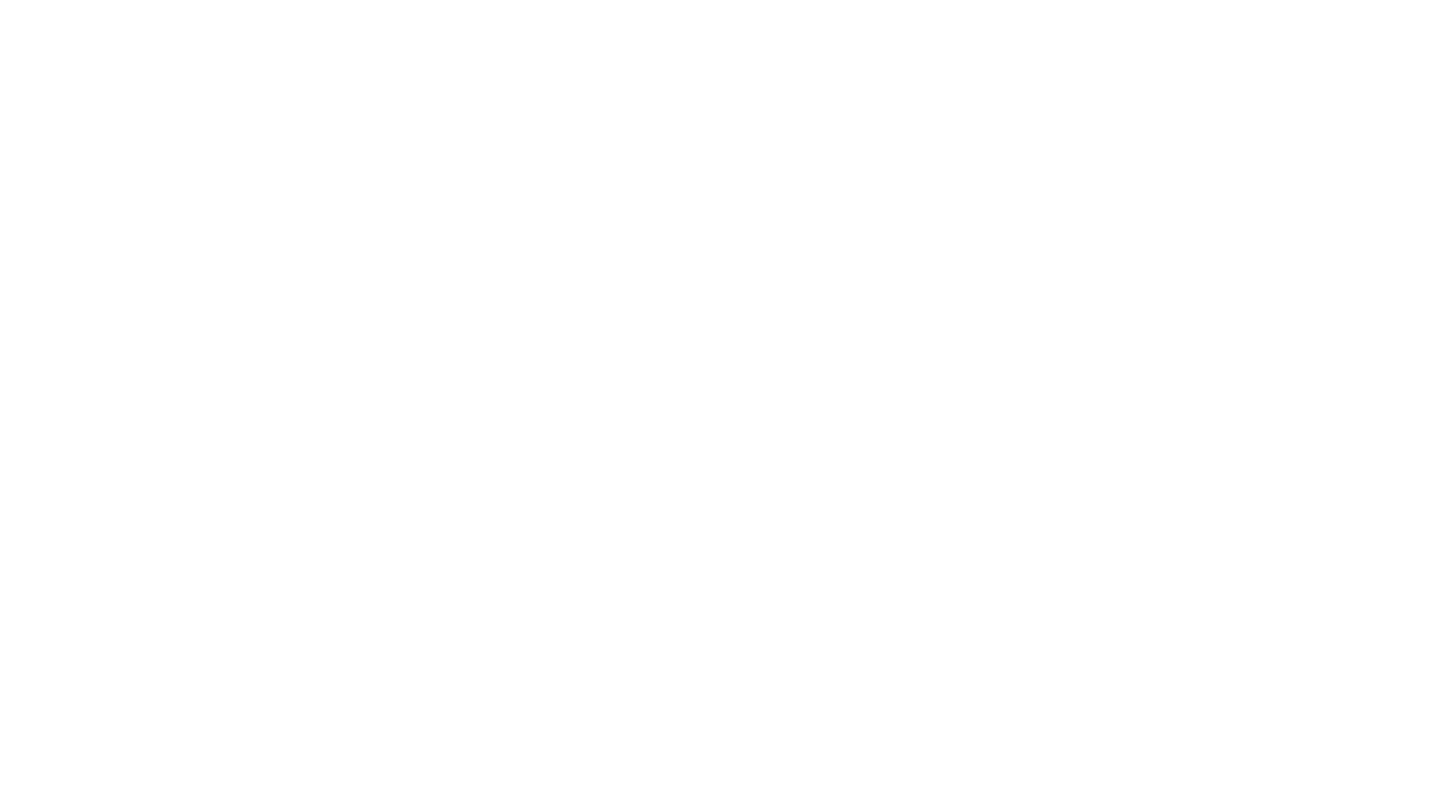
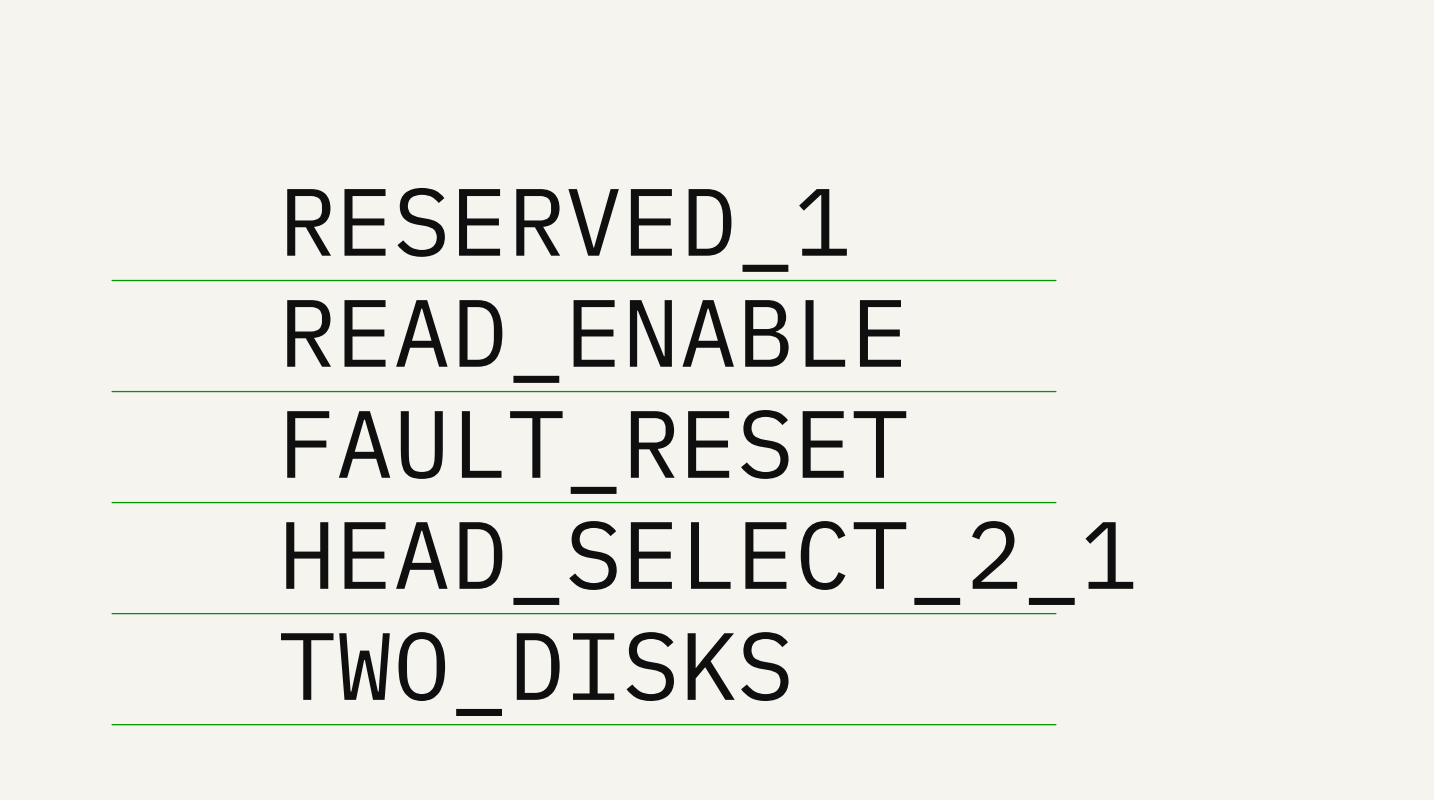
label: none -> RESERVED_1 (567, 229)
wire: none -> (112, 280) (1055, 280)
label: none -> READ_ENABLE (594, 341)
wire: none -> (112, 391) (1055, 391)
label: none -> FAULT_RESET (596, 451)
wire: none -> (112, 502) (1055, 502)
label: none -> HEAD_SELECT_2_1 (709, 563)
wire: none -> (112, 613) (1055, 613)
label: none -> TWO_DISKS (534, 674)
wire: none -> (112, 724) (1055, 724)

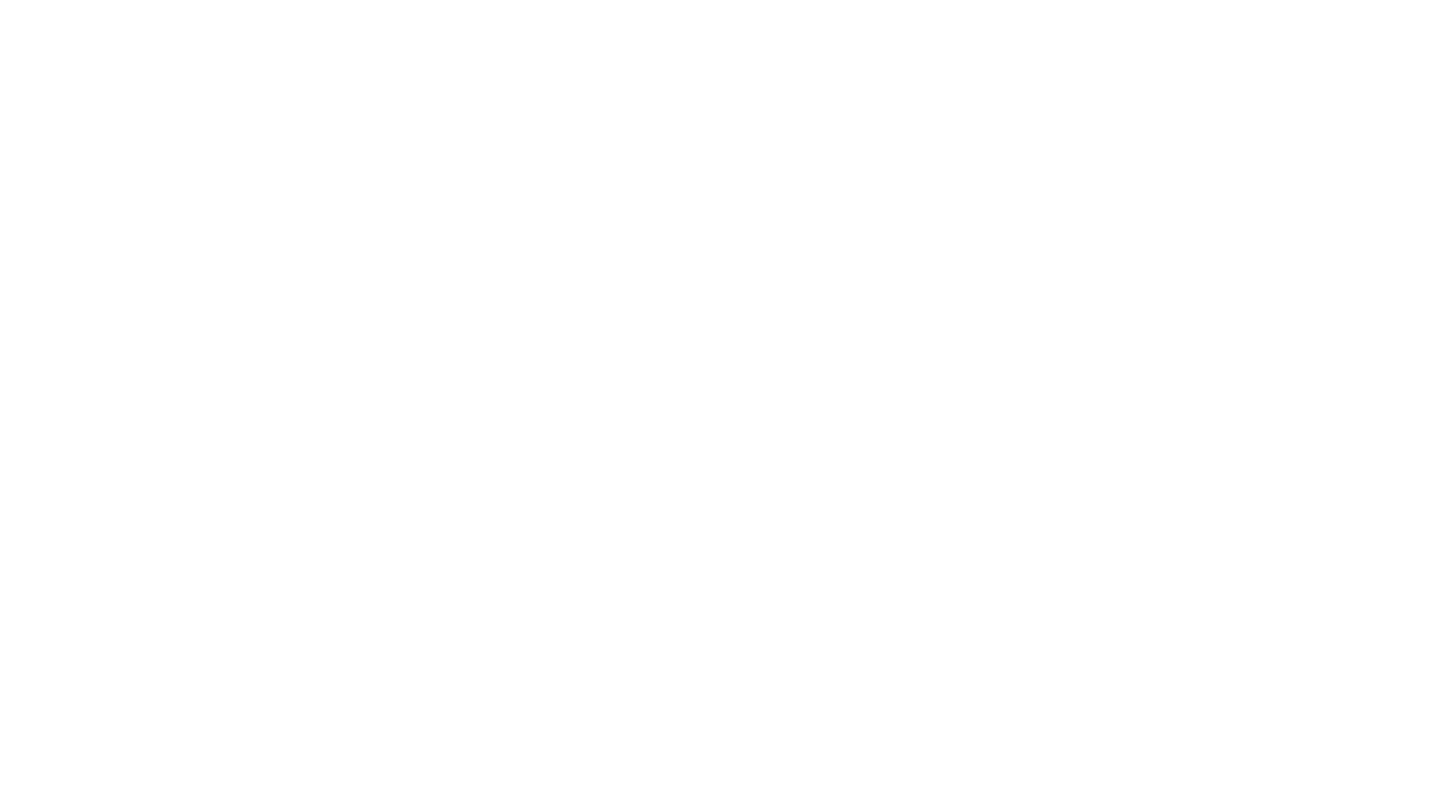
label: RESERVED_1 (567, 229) -> none
wire: (112, 280) (1055, 280) -> none
label: READ_ENABLE (594, 341) -> none
wire: (112, 391) (1055, 391) -> none
label: FAULT_RESET (596, 451) -> none
wire: (112, 502) (1055, 502) -> none
label: HEAD_SELECT_2_1 (709, 563) -> none
wire: (112, 613) (1055, 613) -> none
label: TWO_DISKS (534, 674) -> none
wire: (112, 724) (1055, 724) -> none

